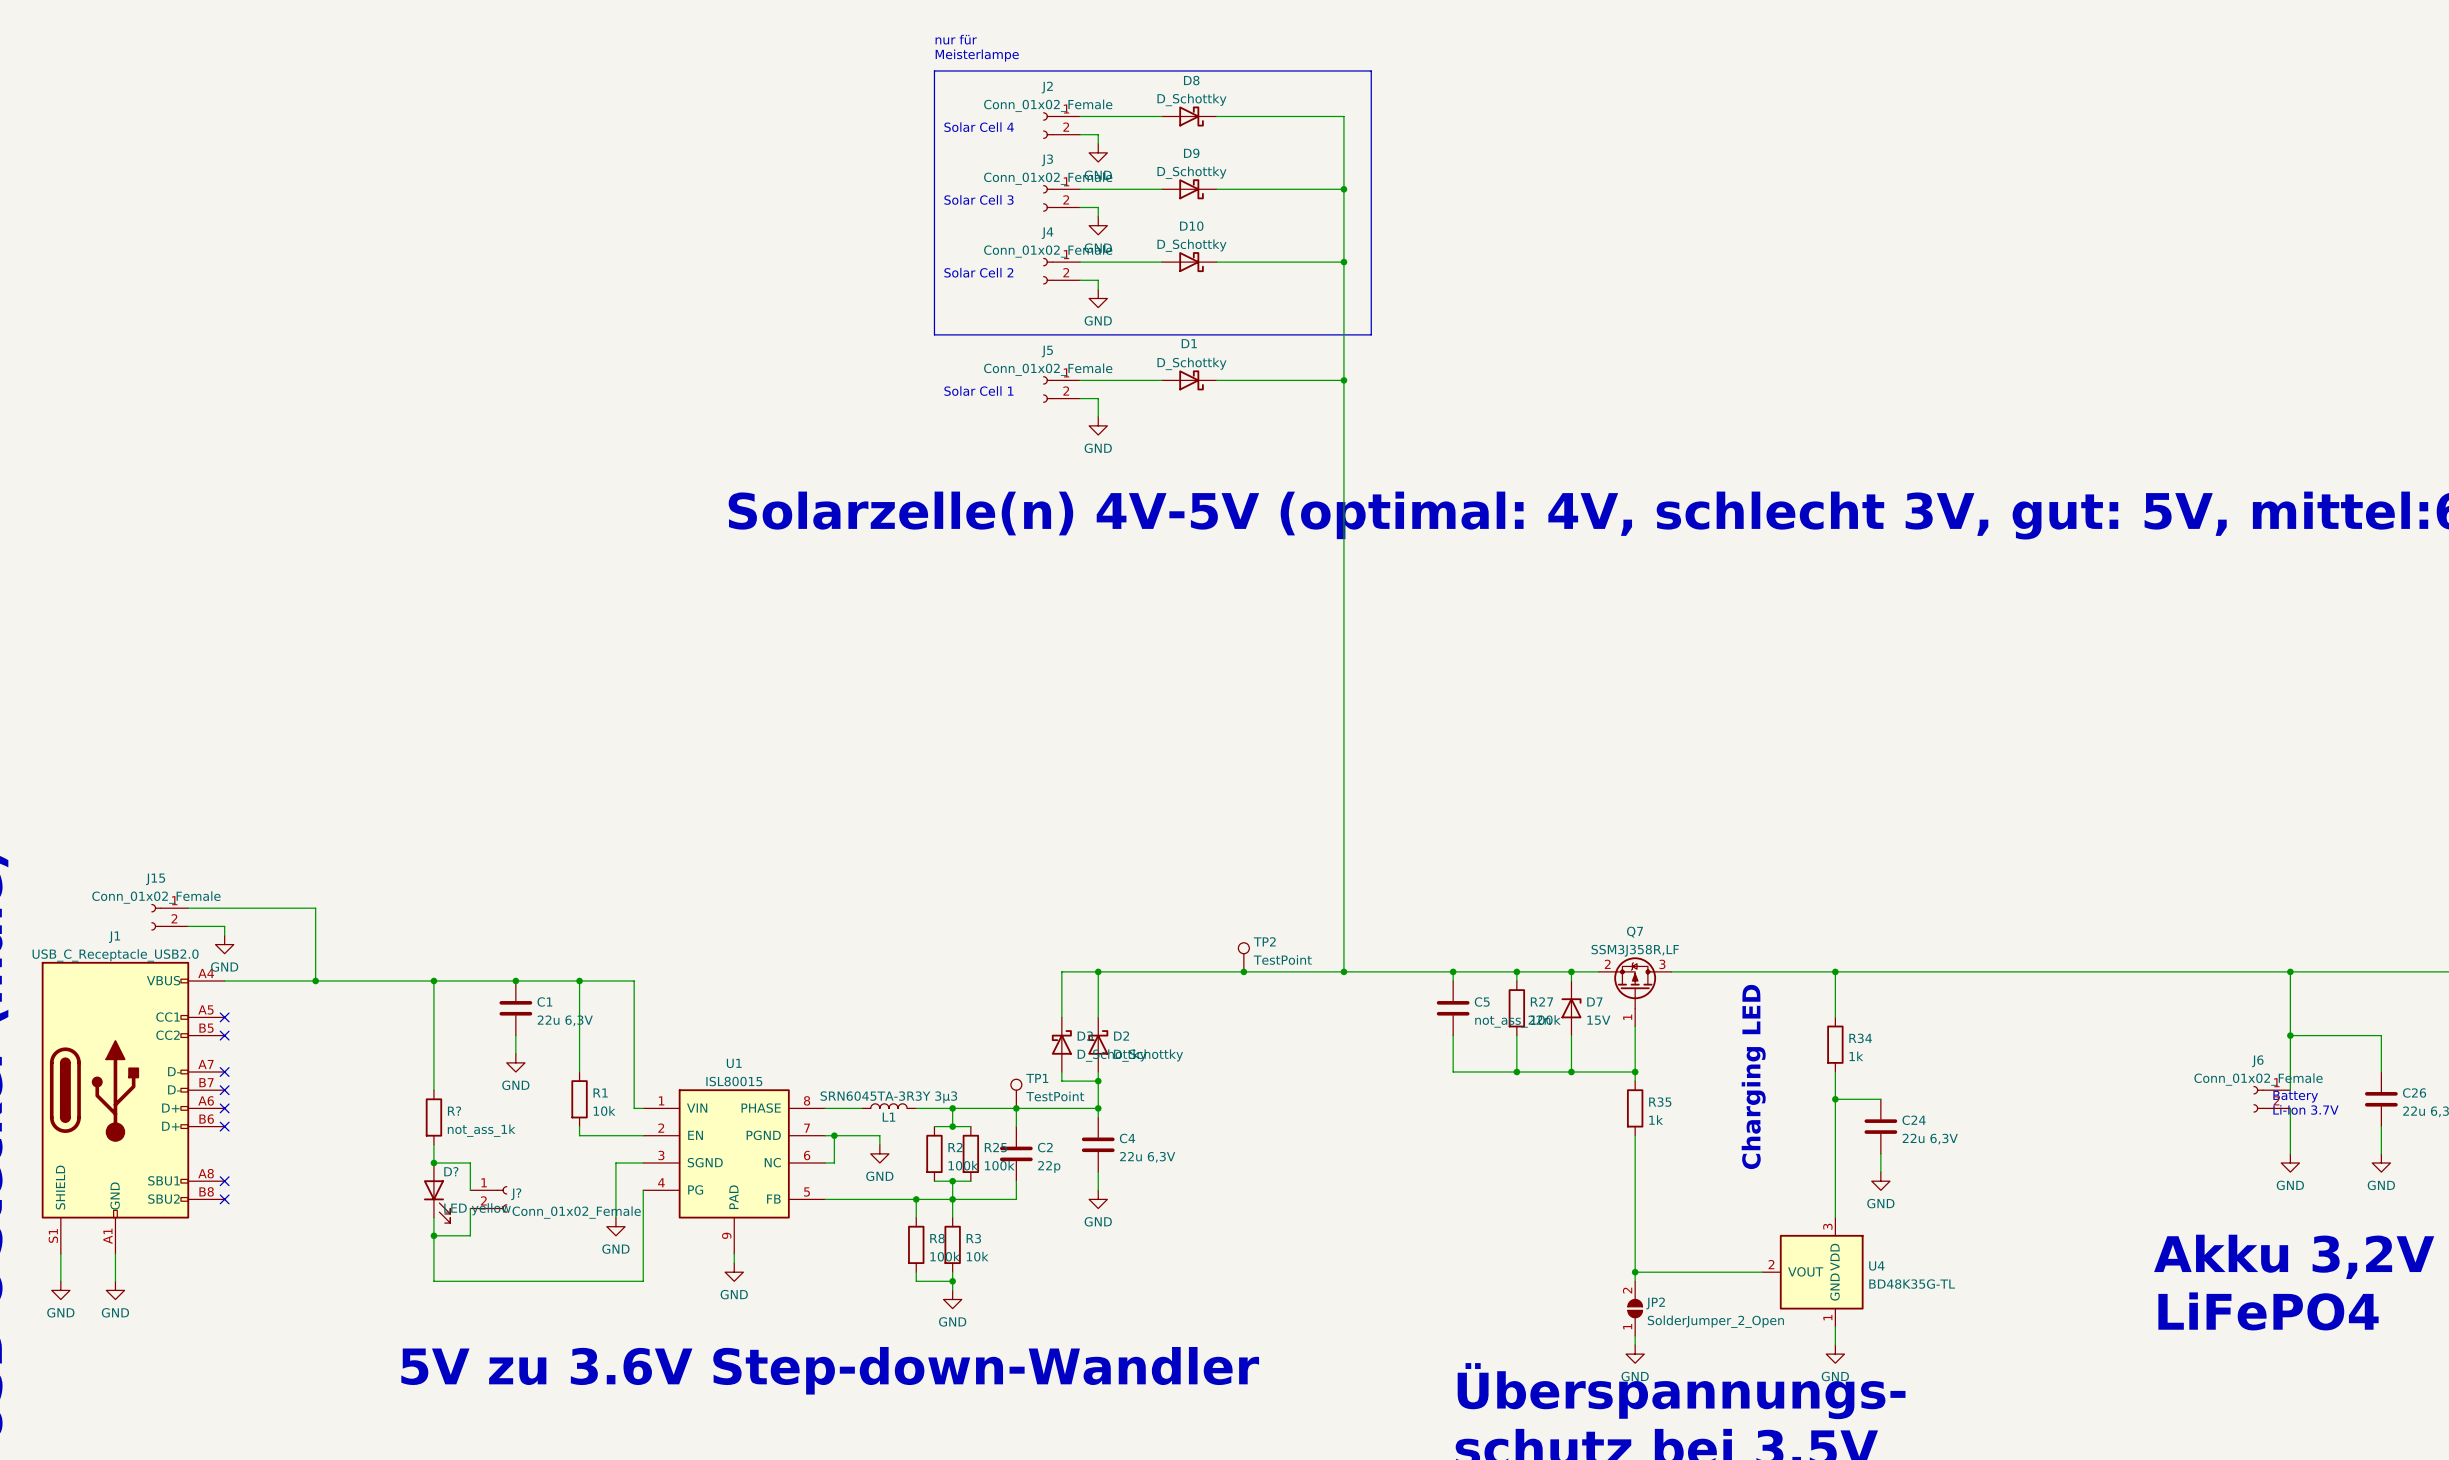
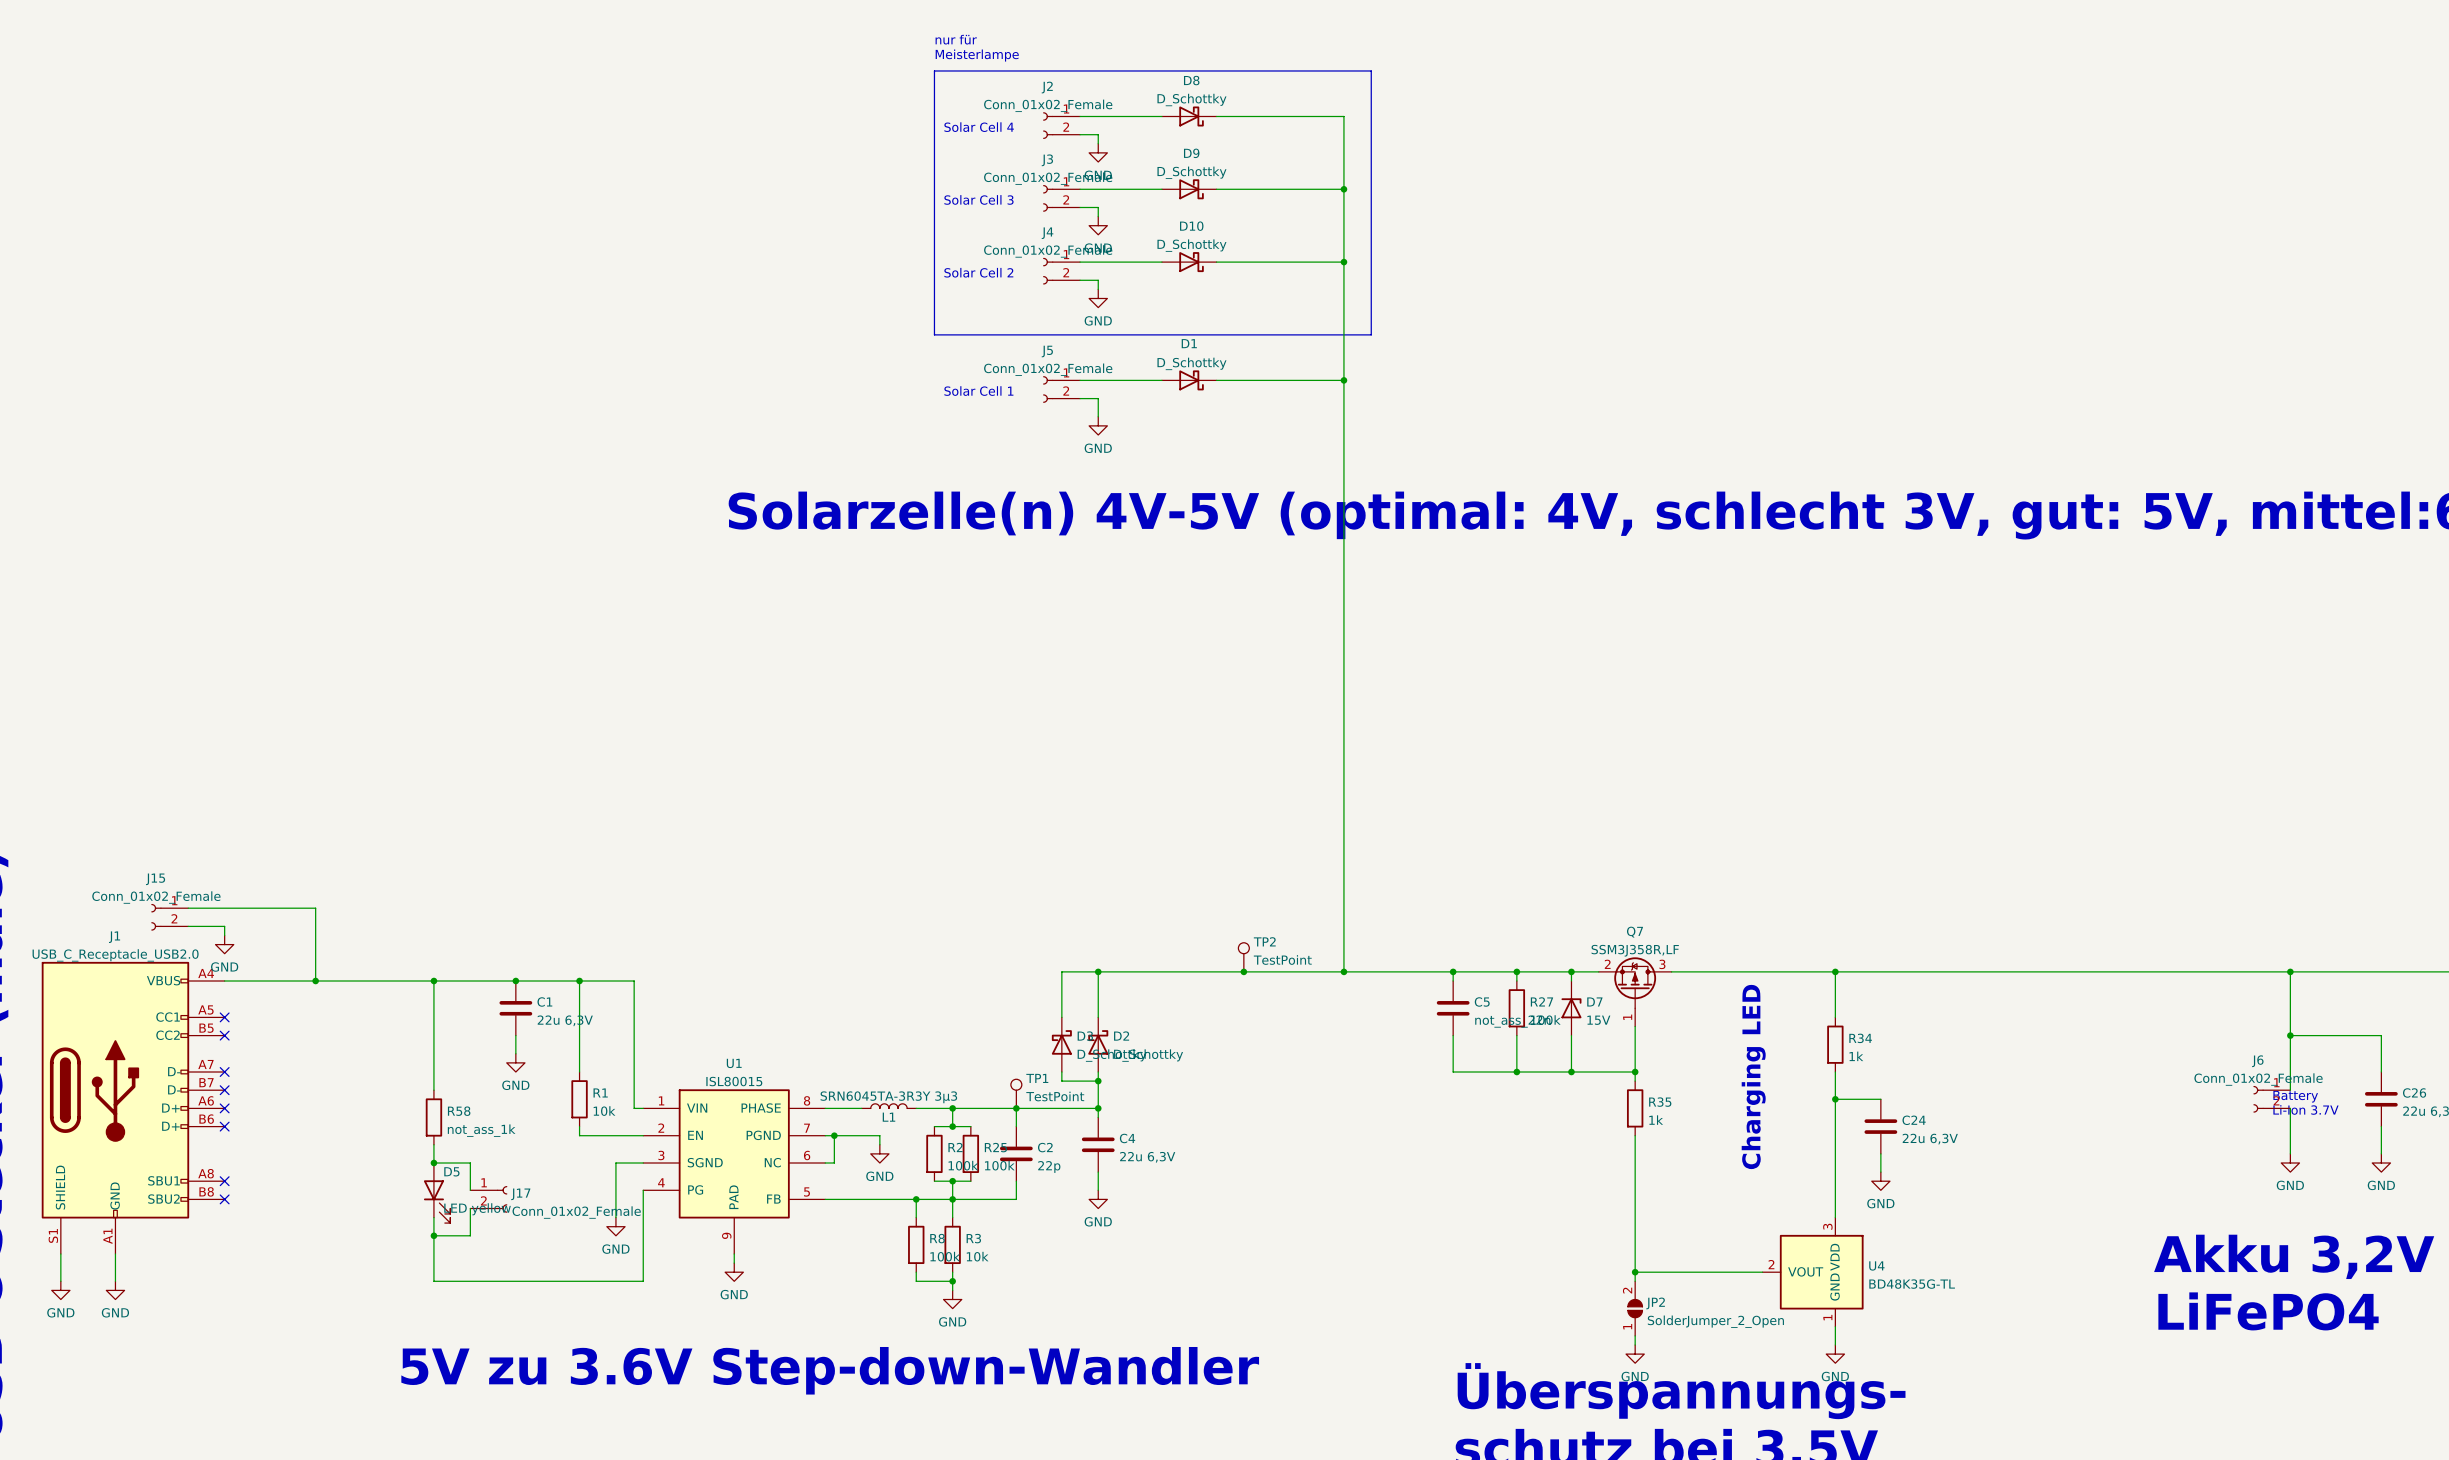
R? name: R? (454, 1111) -> R58 (459, 1111)
D? name: D? (451, 1171) -> D5 (451, 1171)
J? name: J? (516, 1194) -> J17 (520, 1194)

